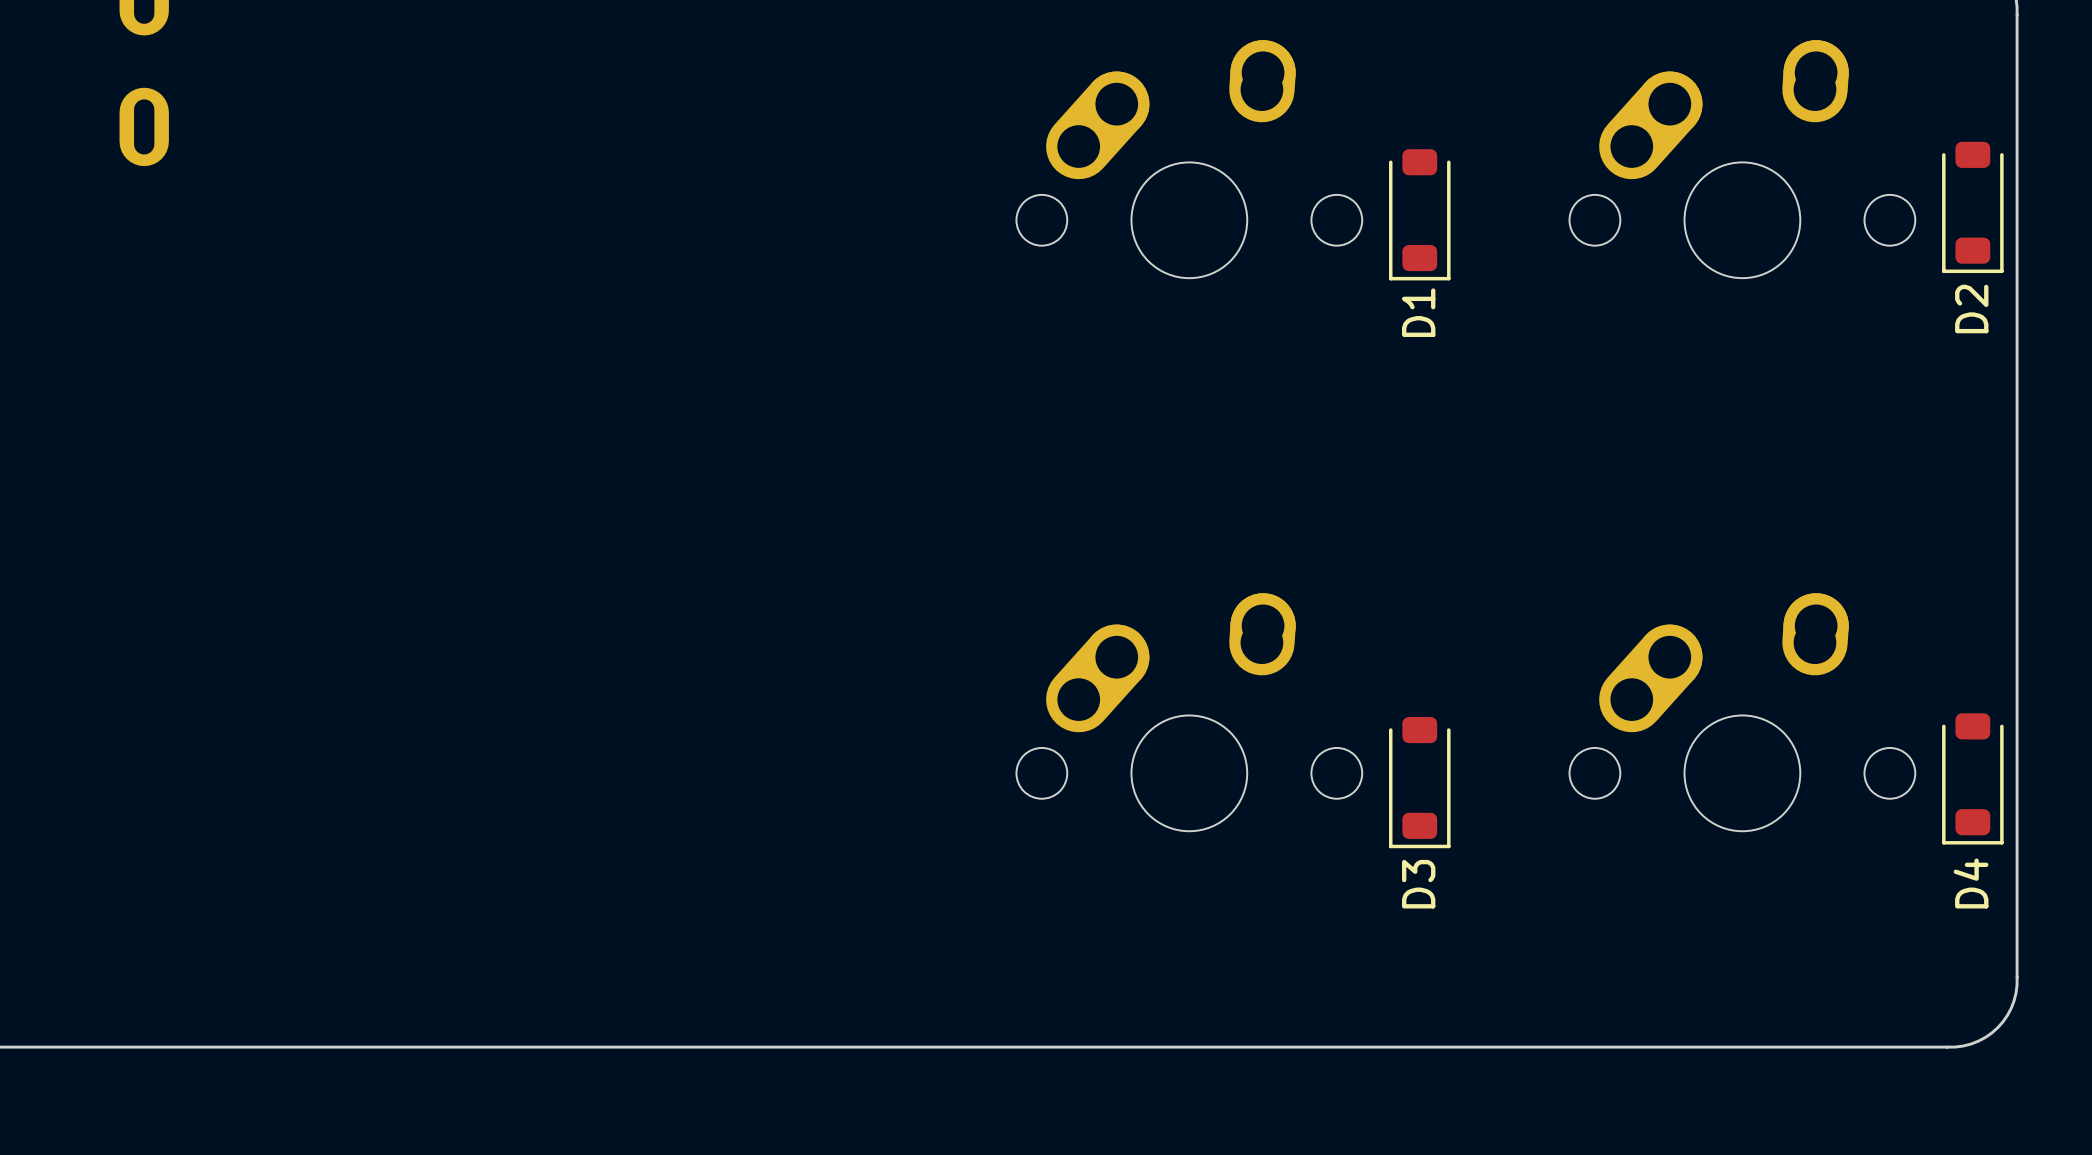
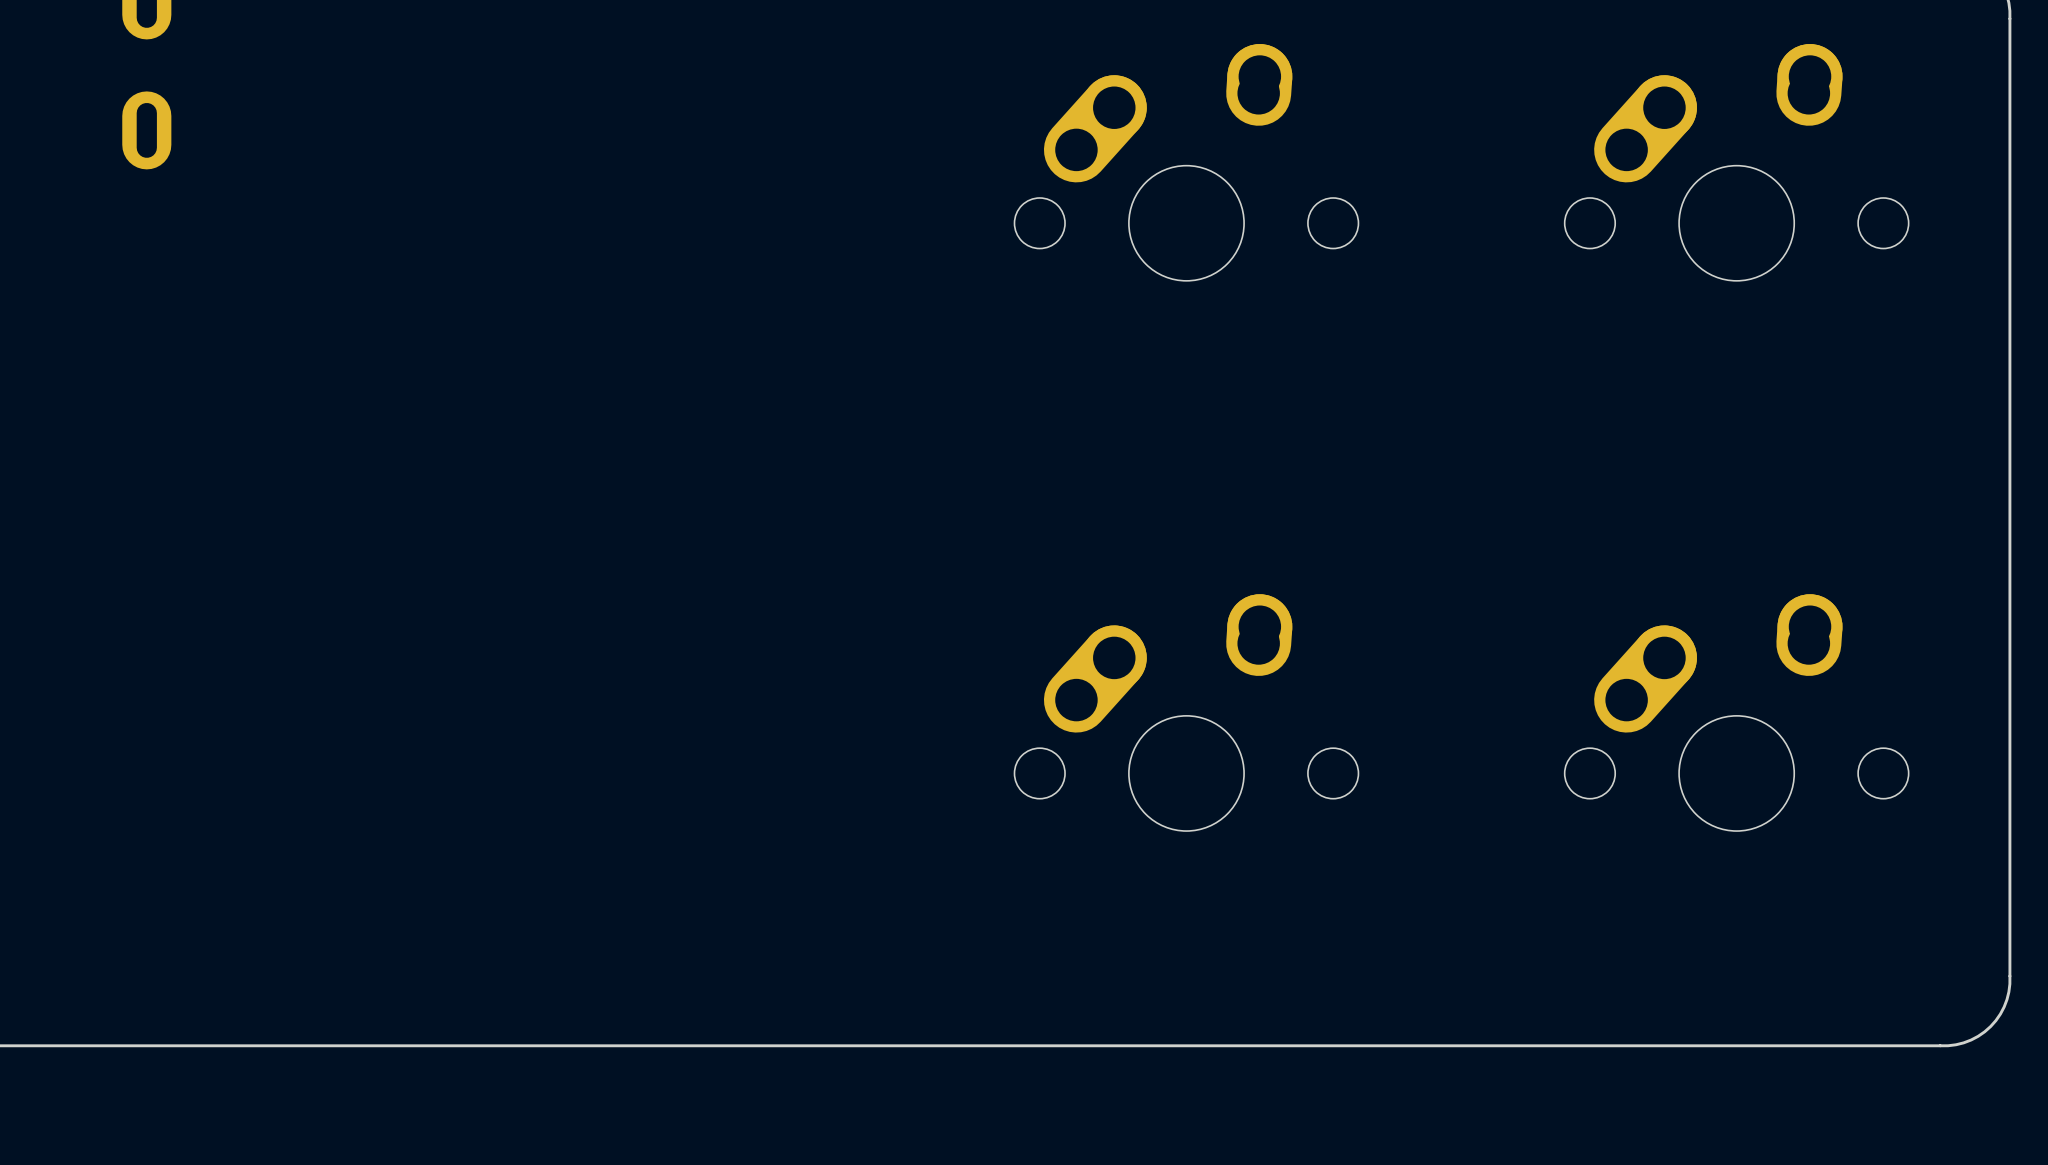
D2: (1972, 207) -> none
D1: (1419, 214) -> none
D4: (1972, 778) -> none
D3: (1419, 782) -> none

